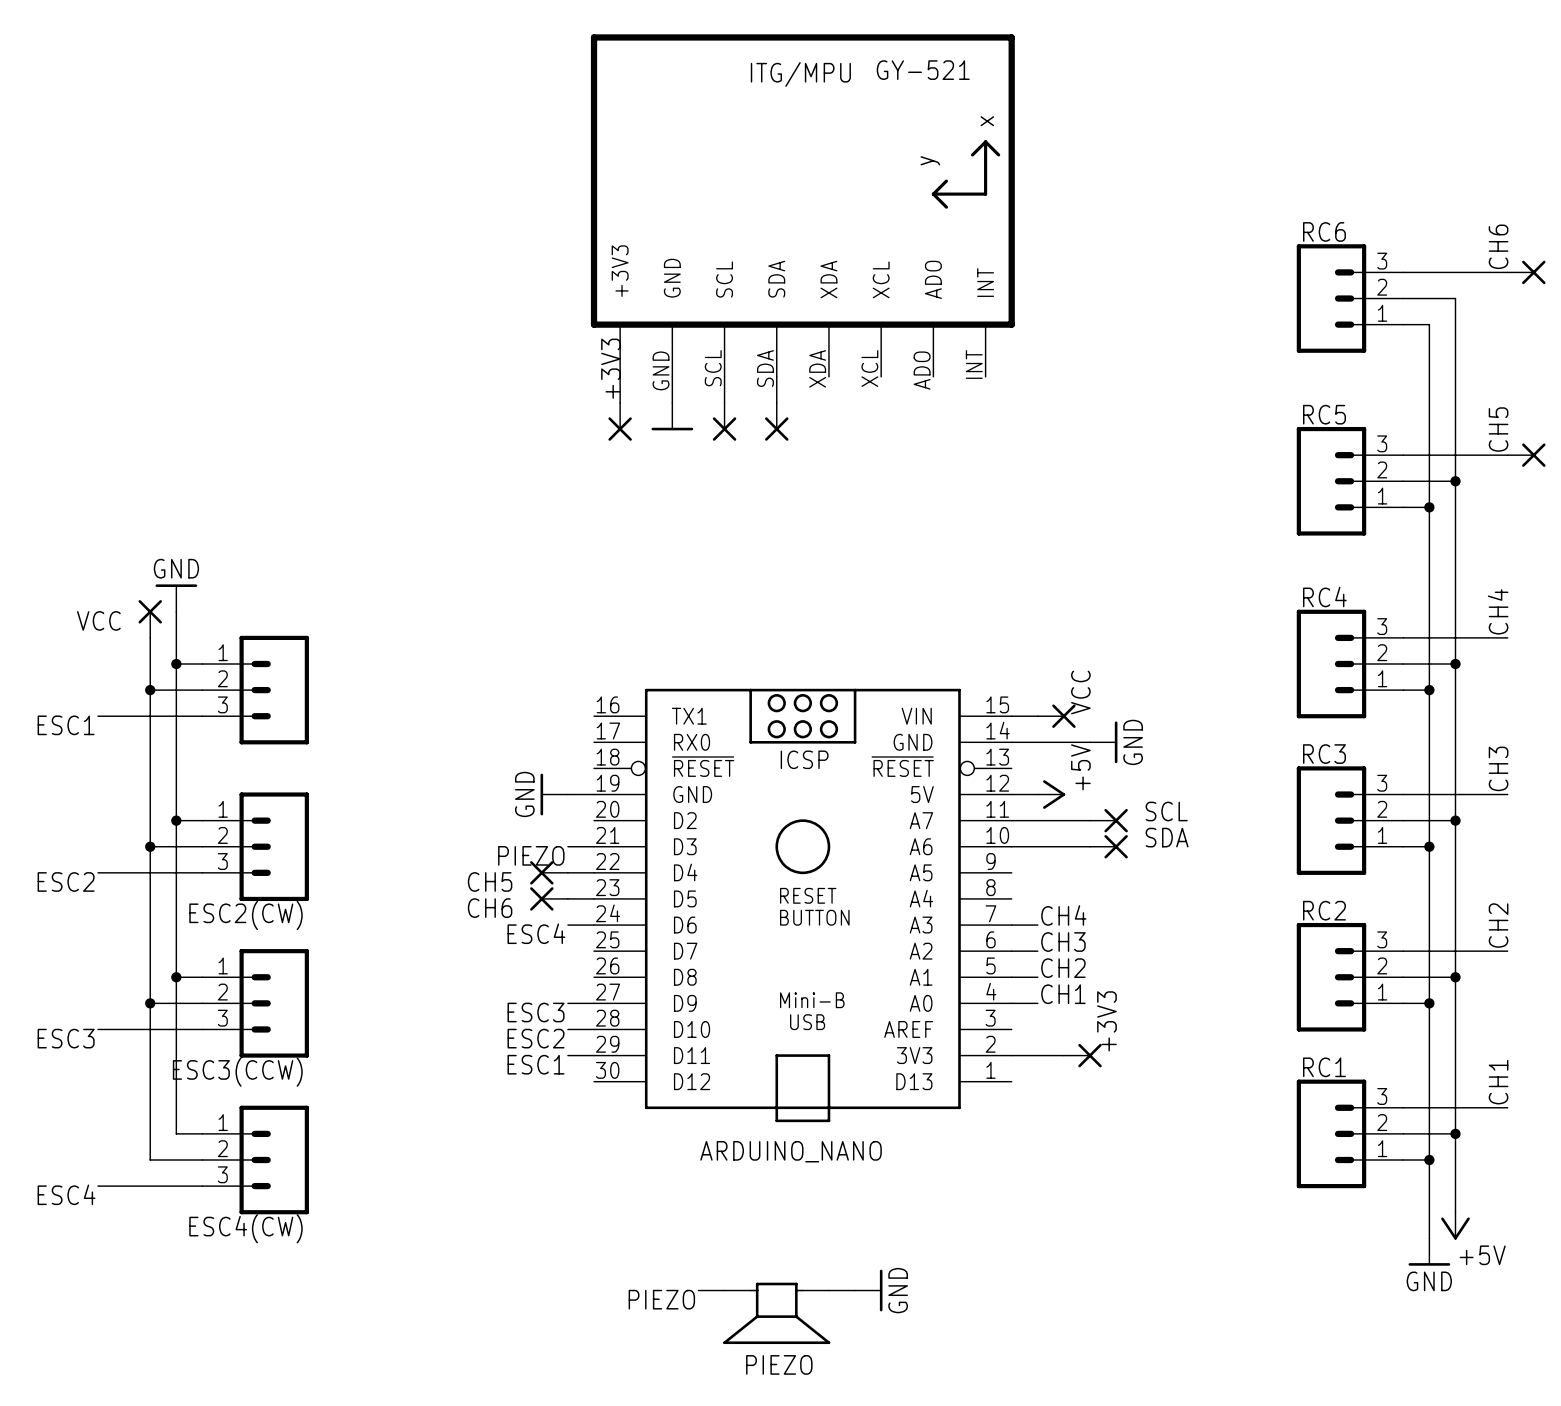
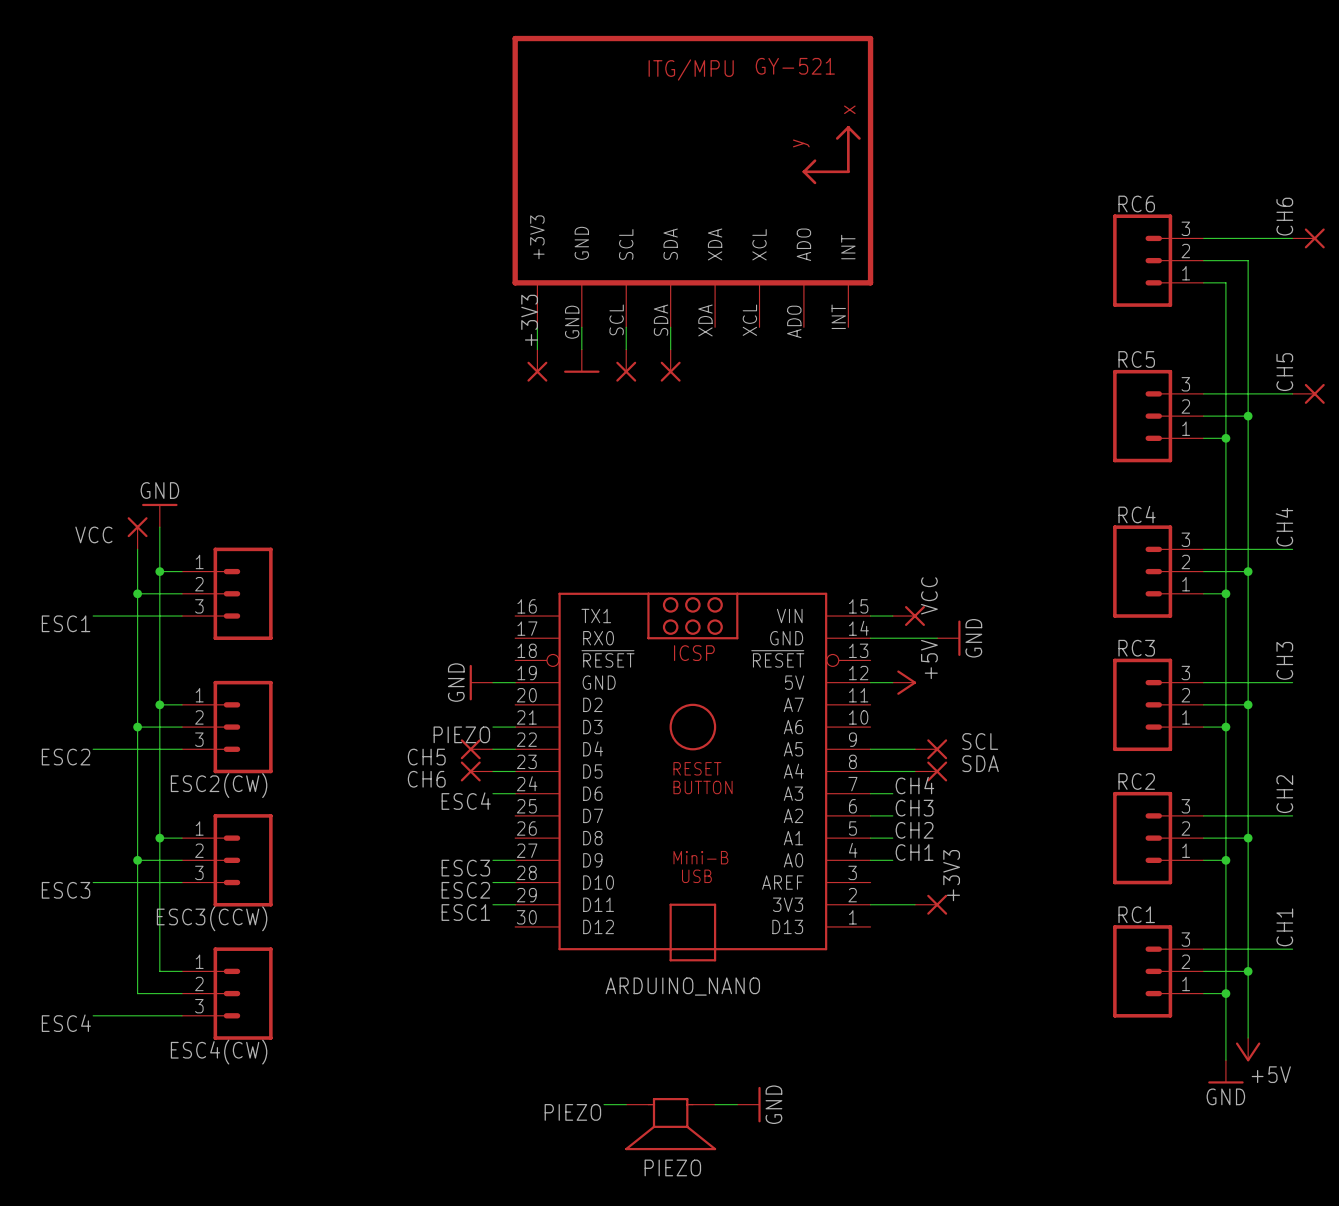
label position: SCL (1166, 811) -> SCL (980, 741)
wire: (1011, 820) (1090, 820) -> none
part: (1108, 820) -> none
label position: SDA (1167, 837) -> SDA (980, 763)
wire: (1011, 846) (1090, 846) -> none
part: (1108, 846) -> none
wire: none -> (870, 749) (914, 749)
part: none -> (931, 749)
wire: none -> (870, 771) (914, 771)
part: none -> (931, 771)

